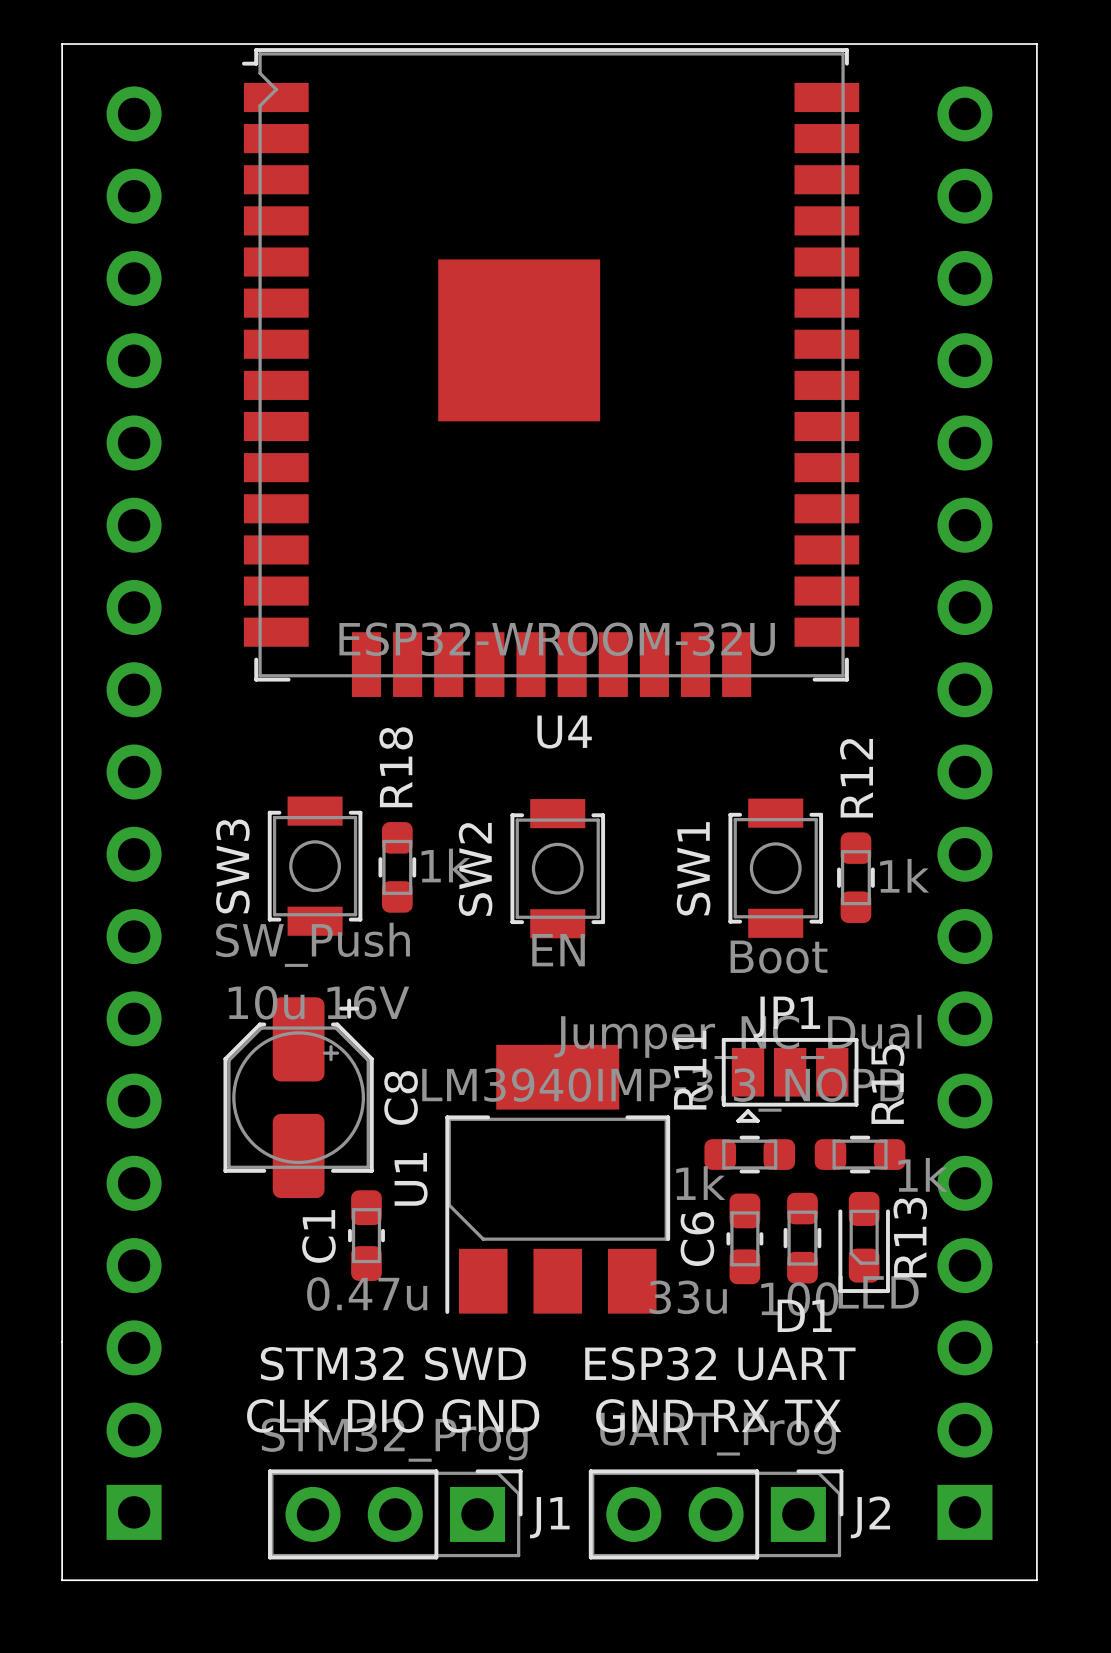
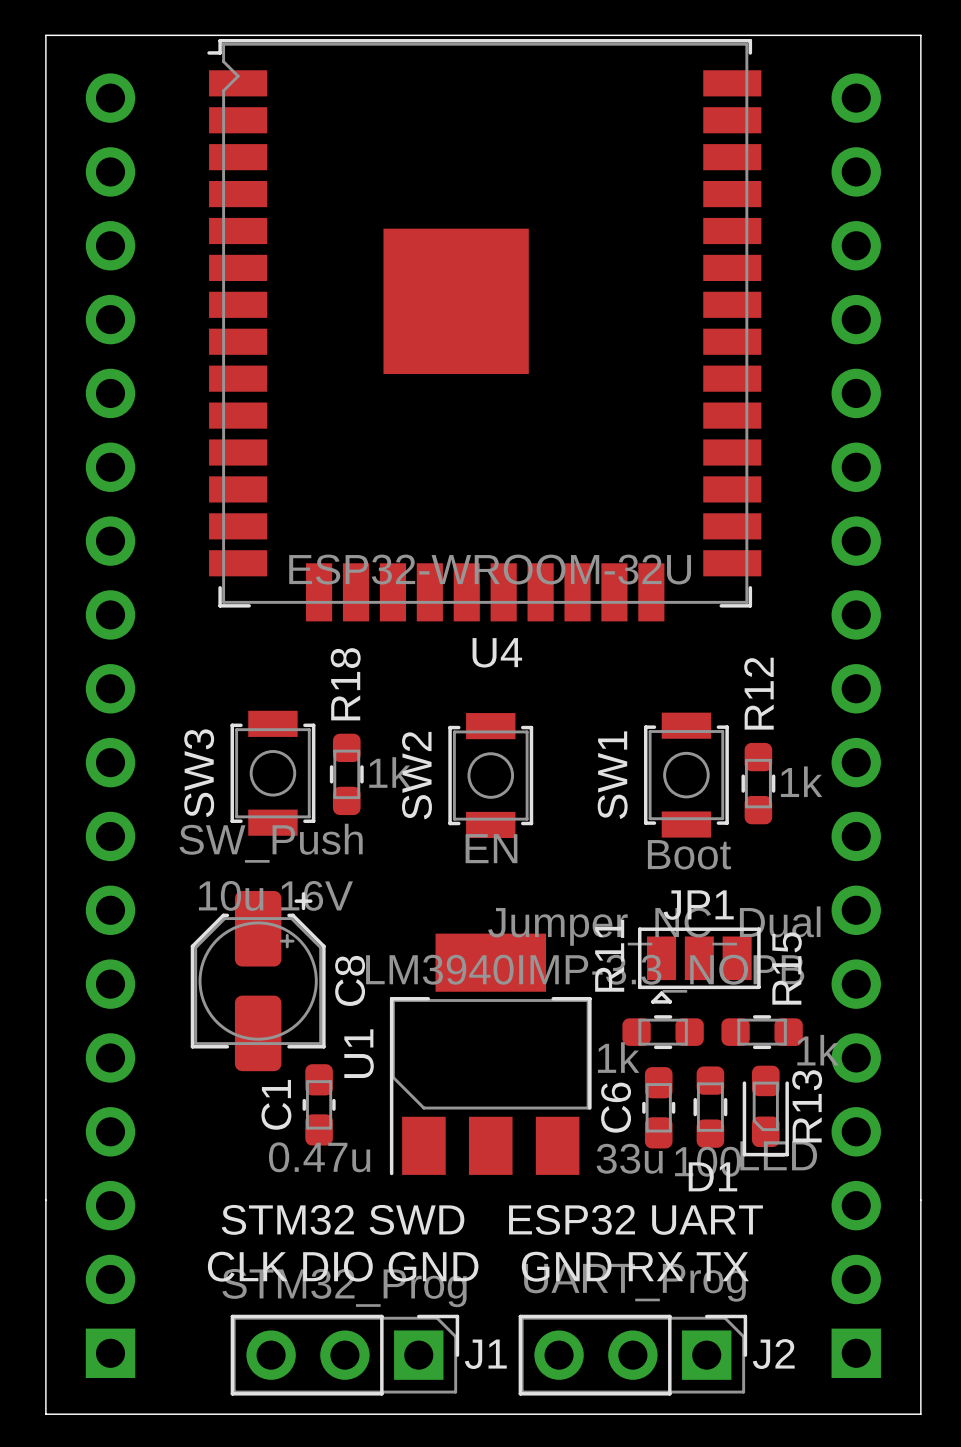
C6 value position: 33u (688, 1297) -> 33u (629, 1158)

